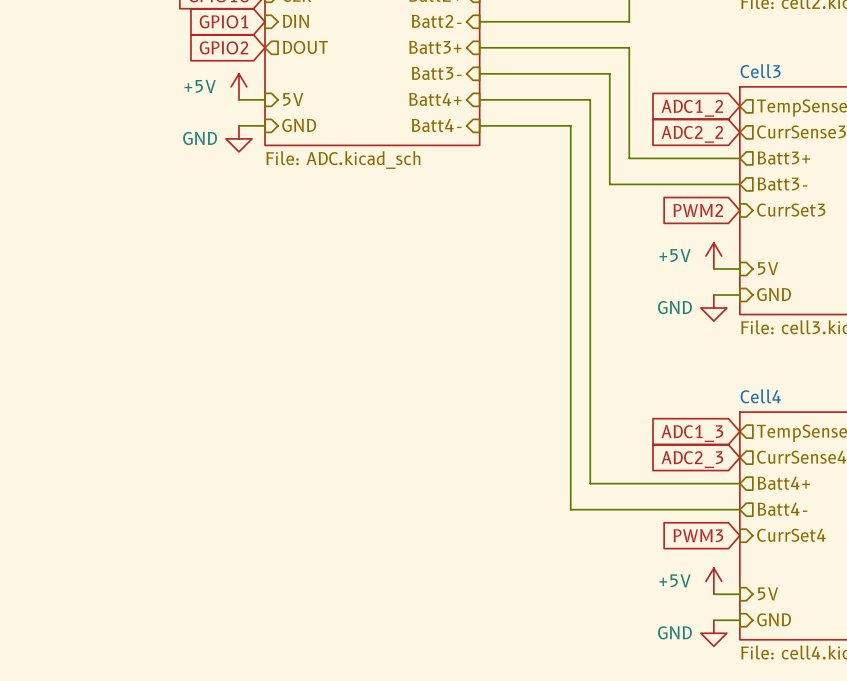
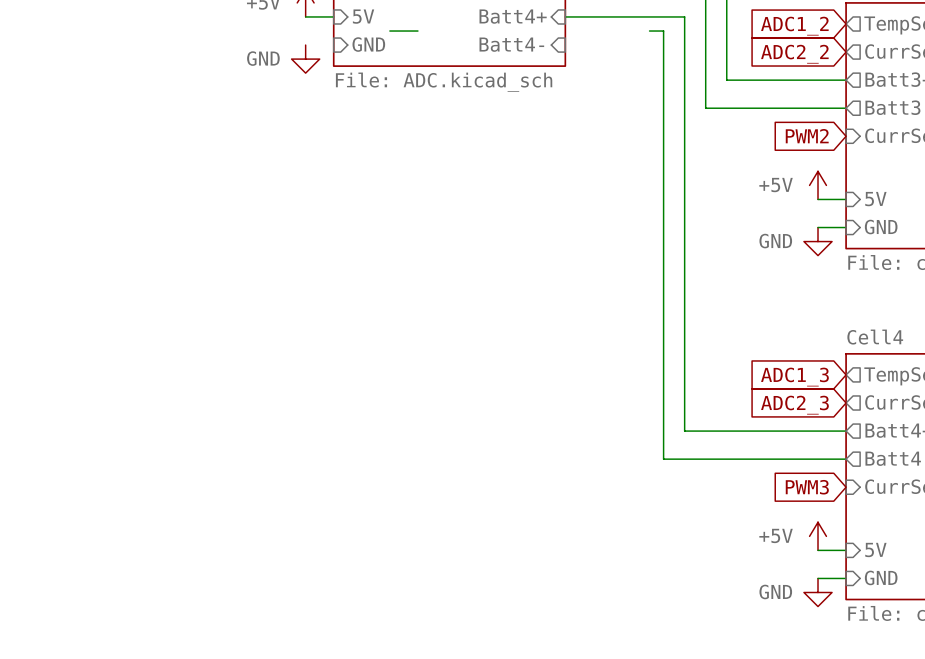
wire: (238, 125) (265, 125) -> (389, 31) (417, 31)
wire: (479, 125) (570, 125) -> (649, 31) (663, 31) (663, 45)

